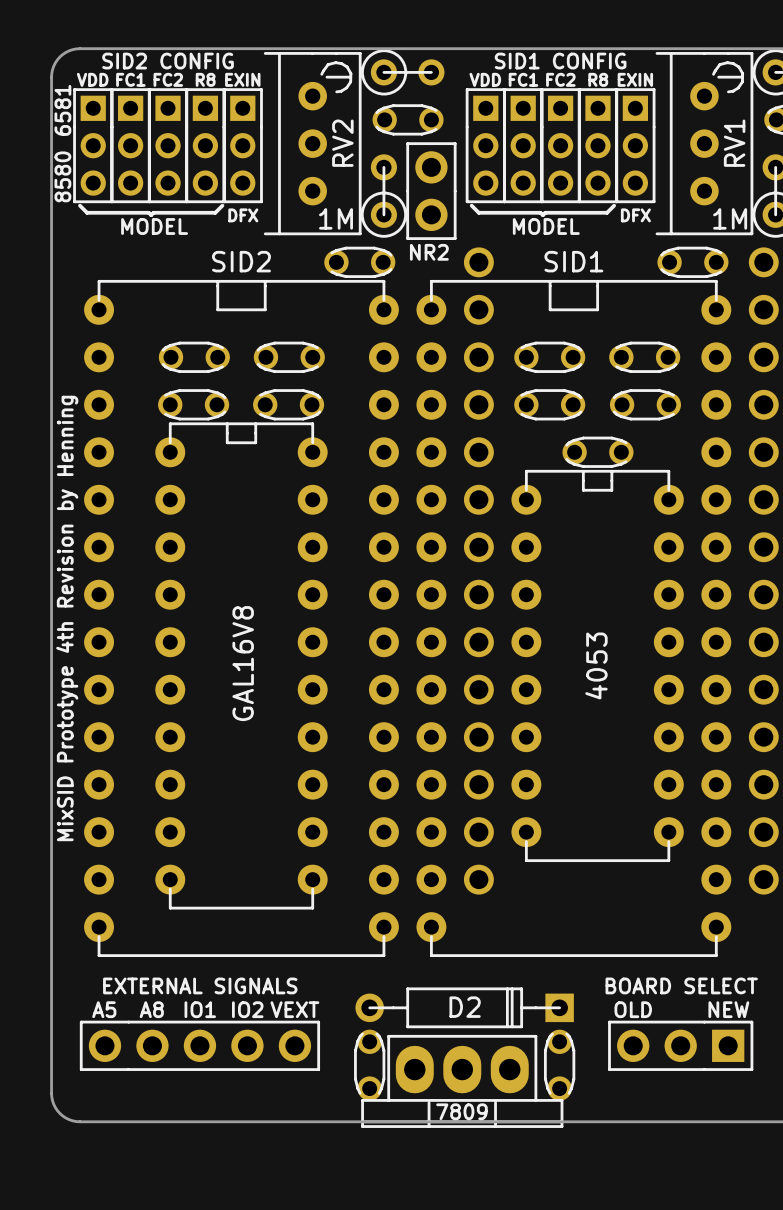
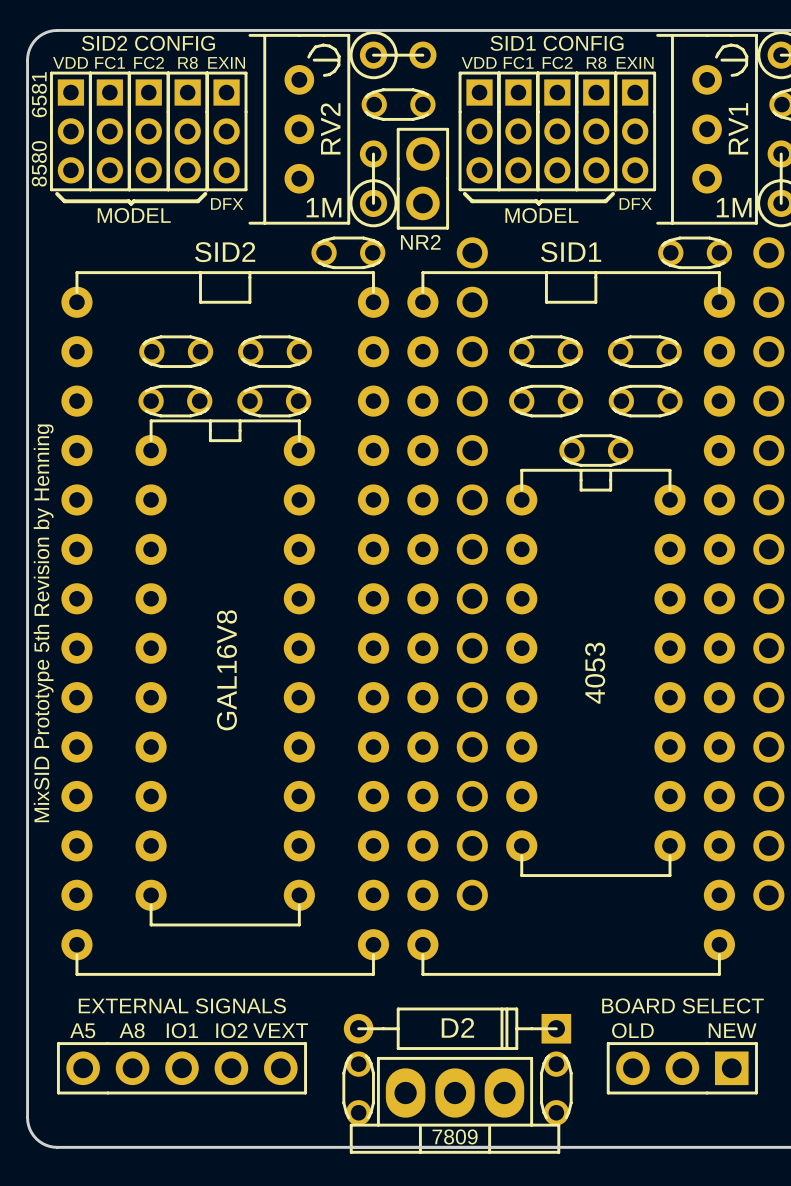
text: MixSID Prototype 4th Revision by Henning (67, 618) -> MixSID Prototype 5th Revision by Henning (43, 623)

